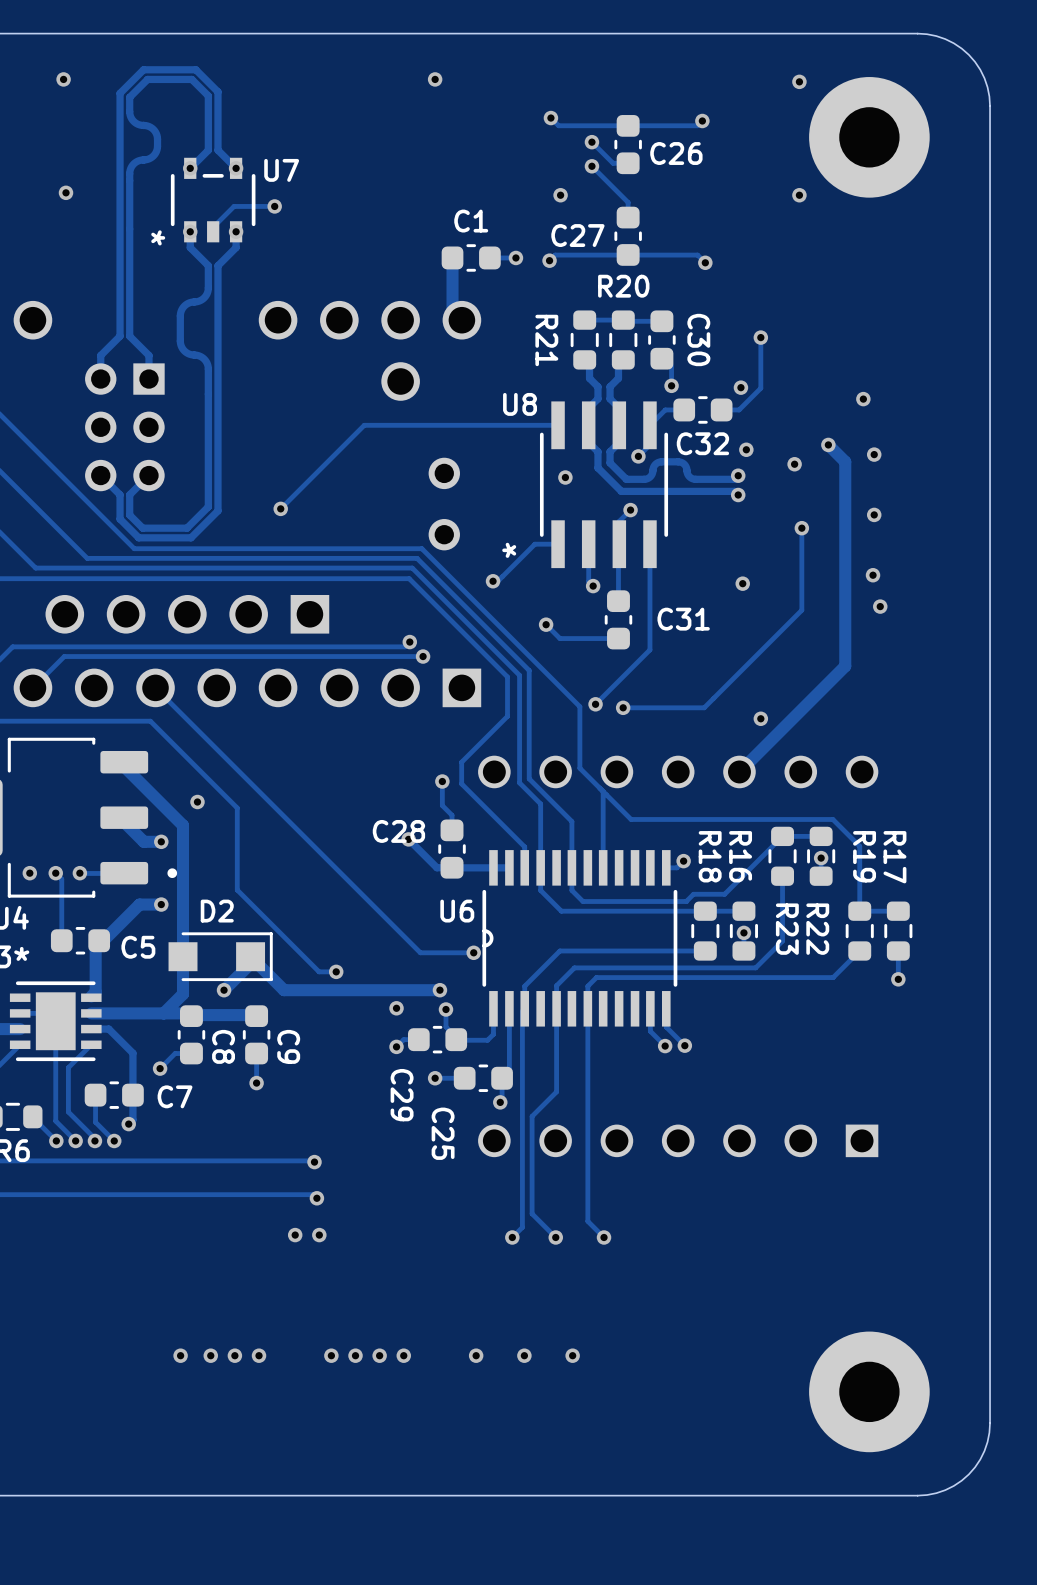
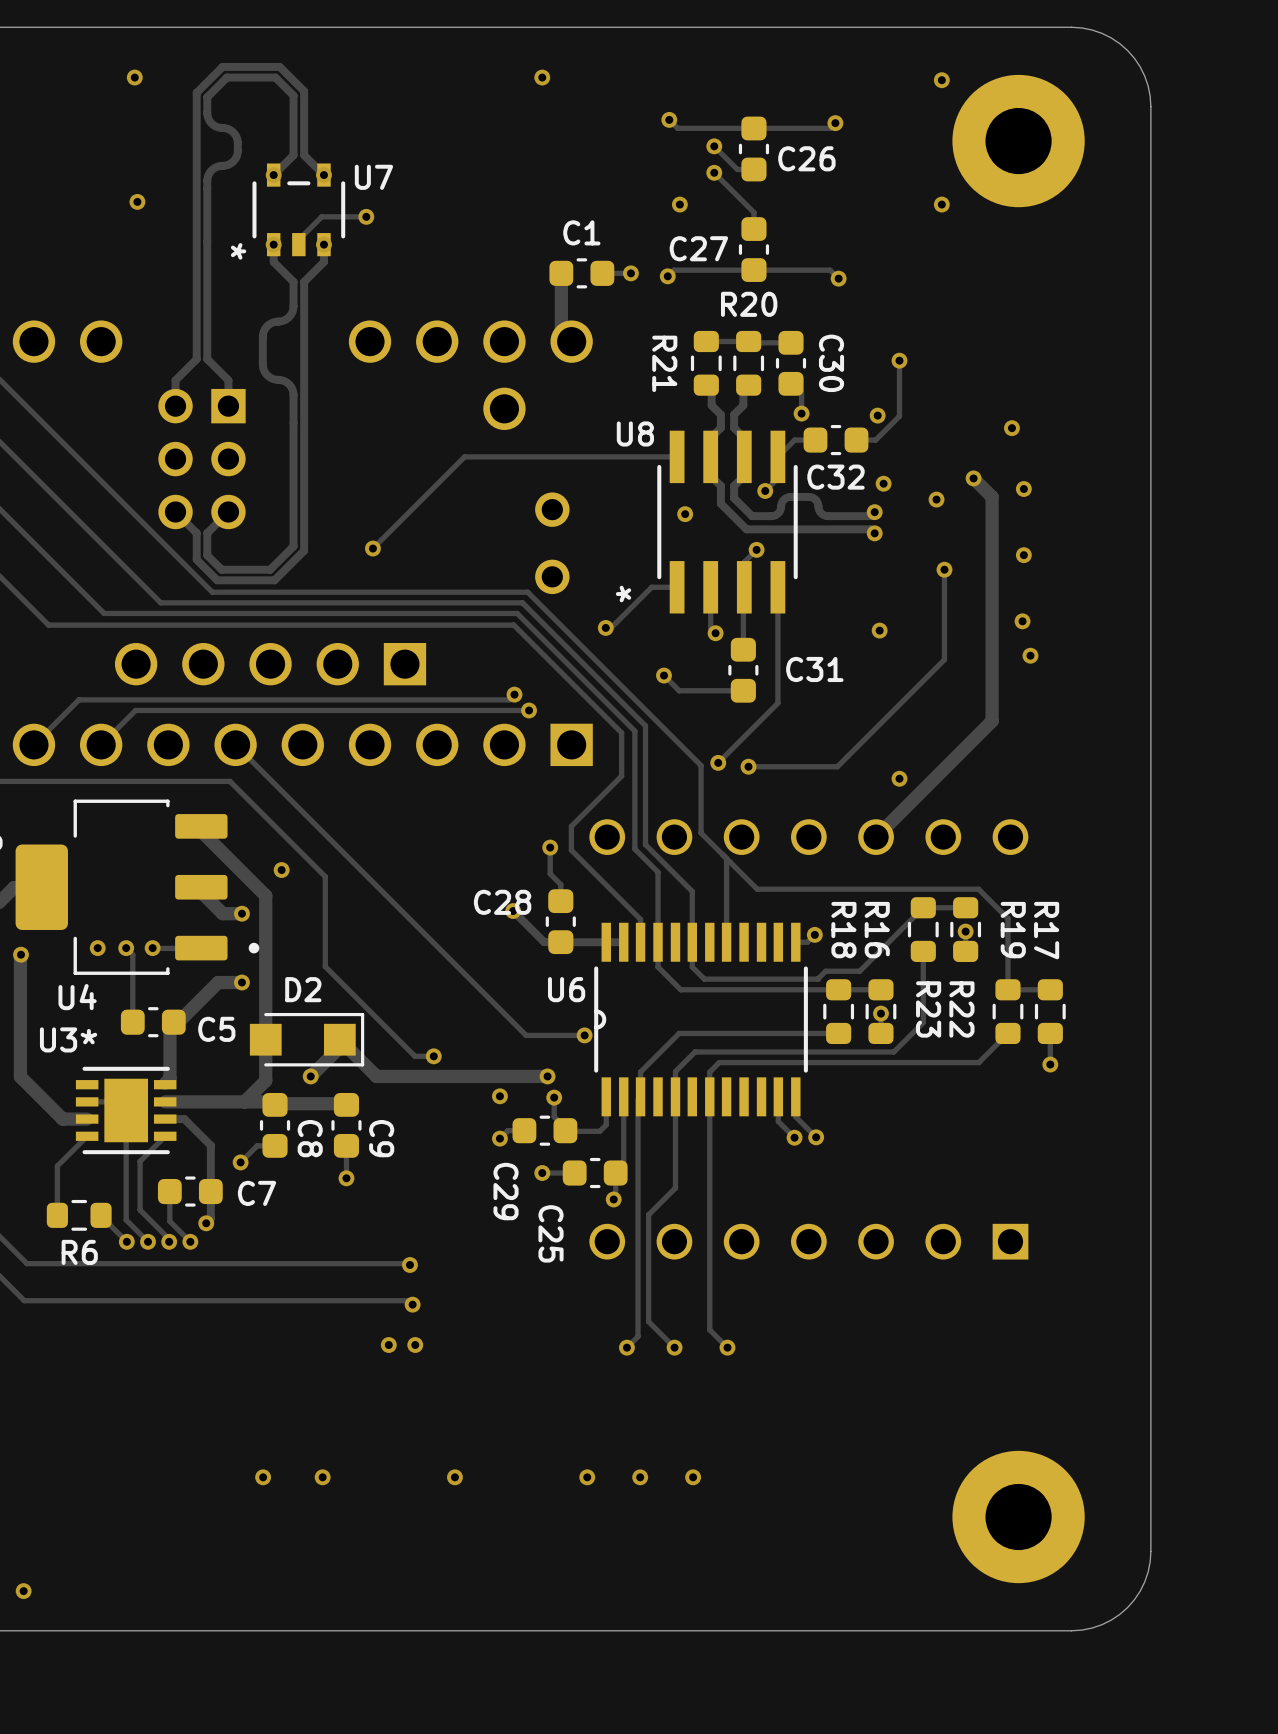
via: (210, 1355) -> none
via: (259, 1355) -> none
via: (331, 1355) -> none
via: (379, 1355) -> none
via: (403, 1355) -> none

